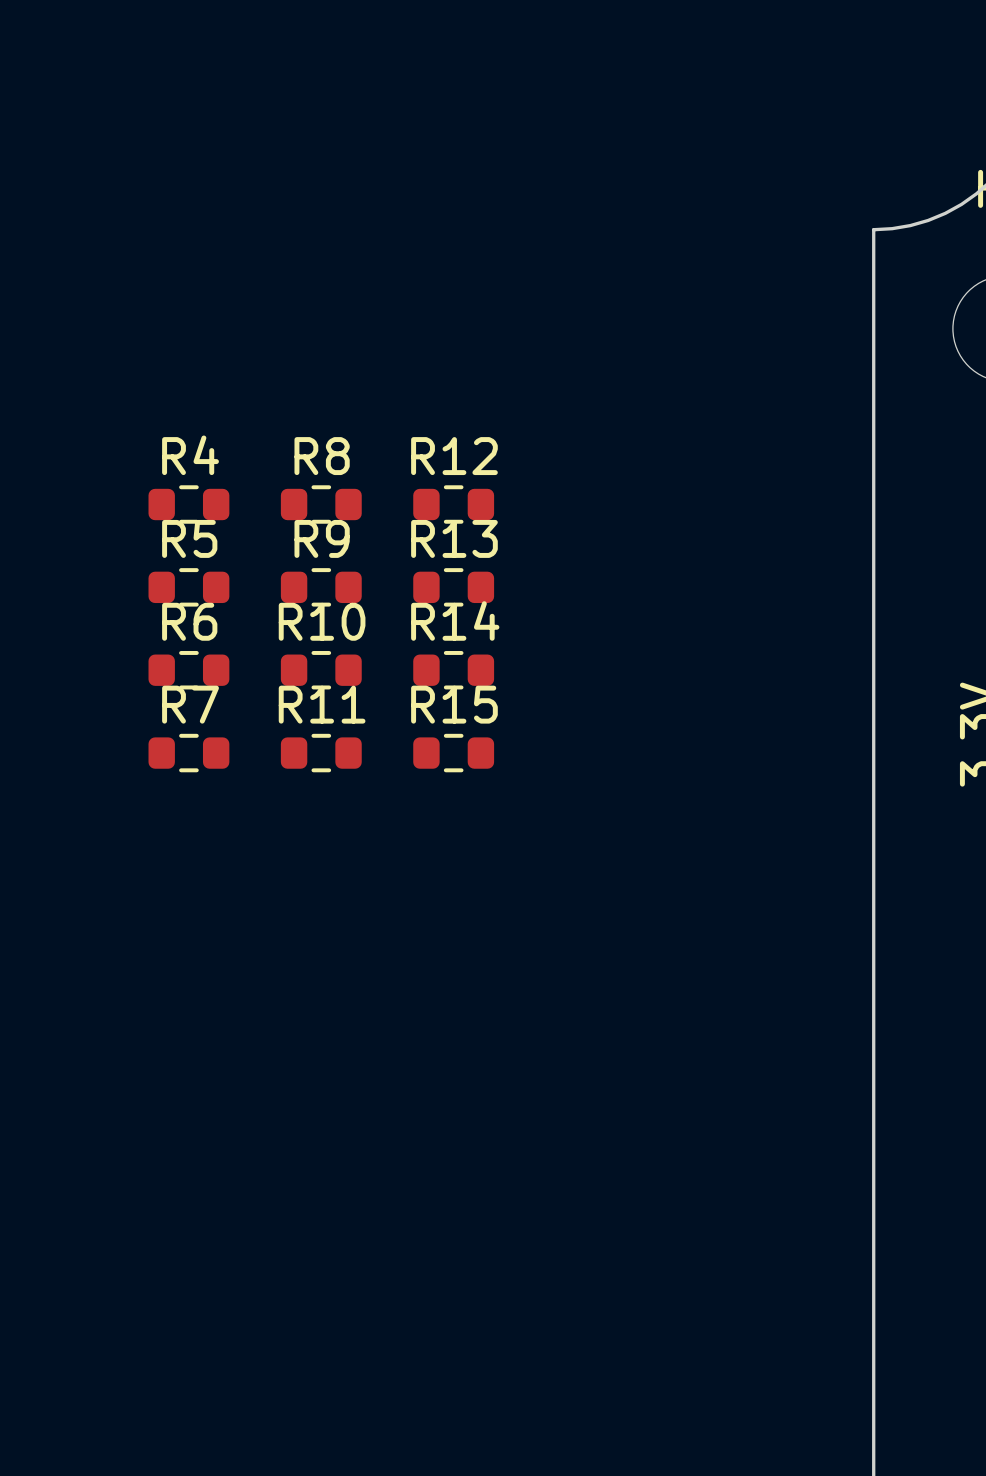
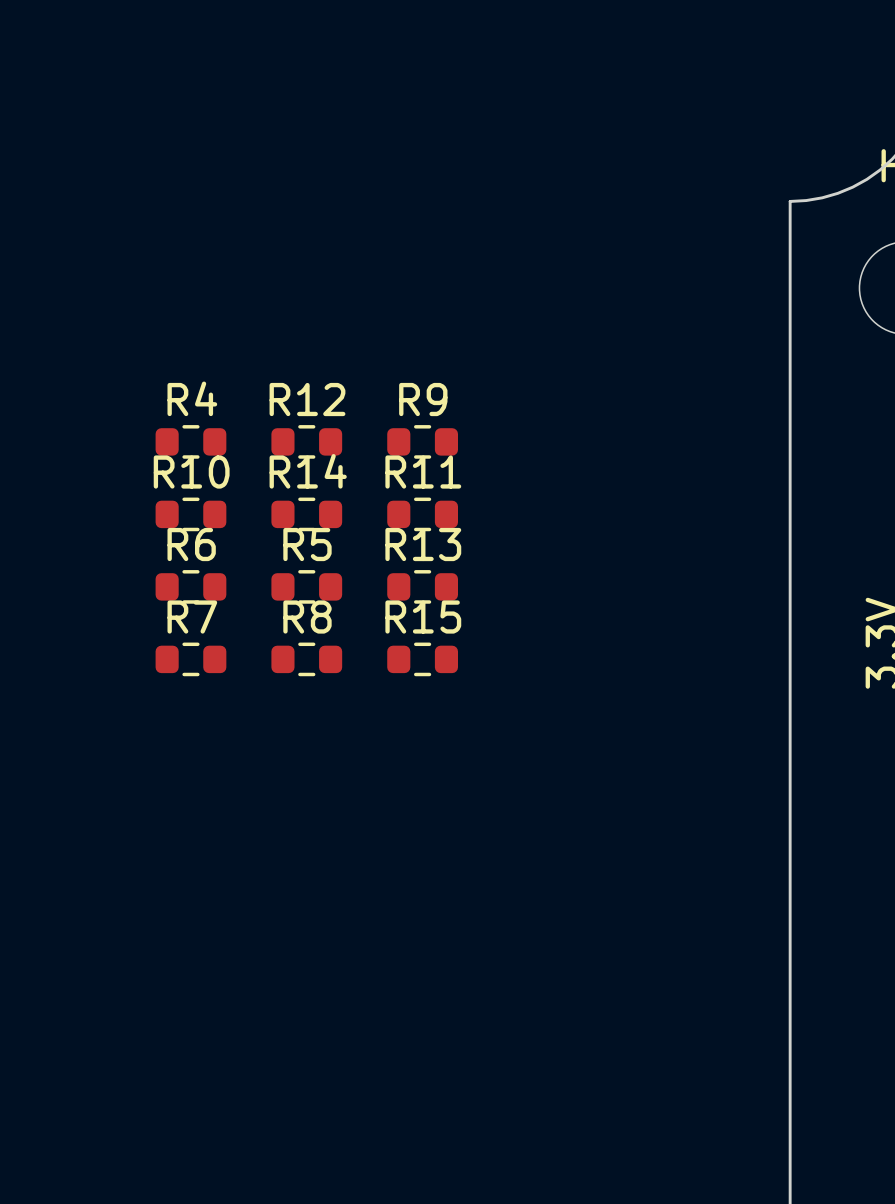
R8 name: R8 (322, 456) -> R12 (307, 399)
R12 name: R12 (454, 456) -> R9 (423, 399)
R5 name: R5 (189, 538) -> R10 (191, 472)
R9 name: R9 (322, 538) -> R14 (308, 471)
R13 name: R13 (454, 538) -> R11 (423, 472)
R14 name: R14 (455, 620) -> R13 (423, 544)
R10 name: R10 (322, 621) -> R5 (307, 544)
R11 name: R11 (322, 704) -> R8 (307, 617)

